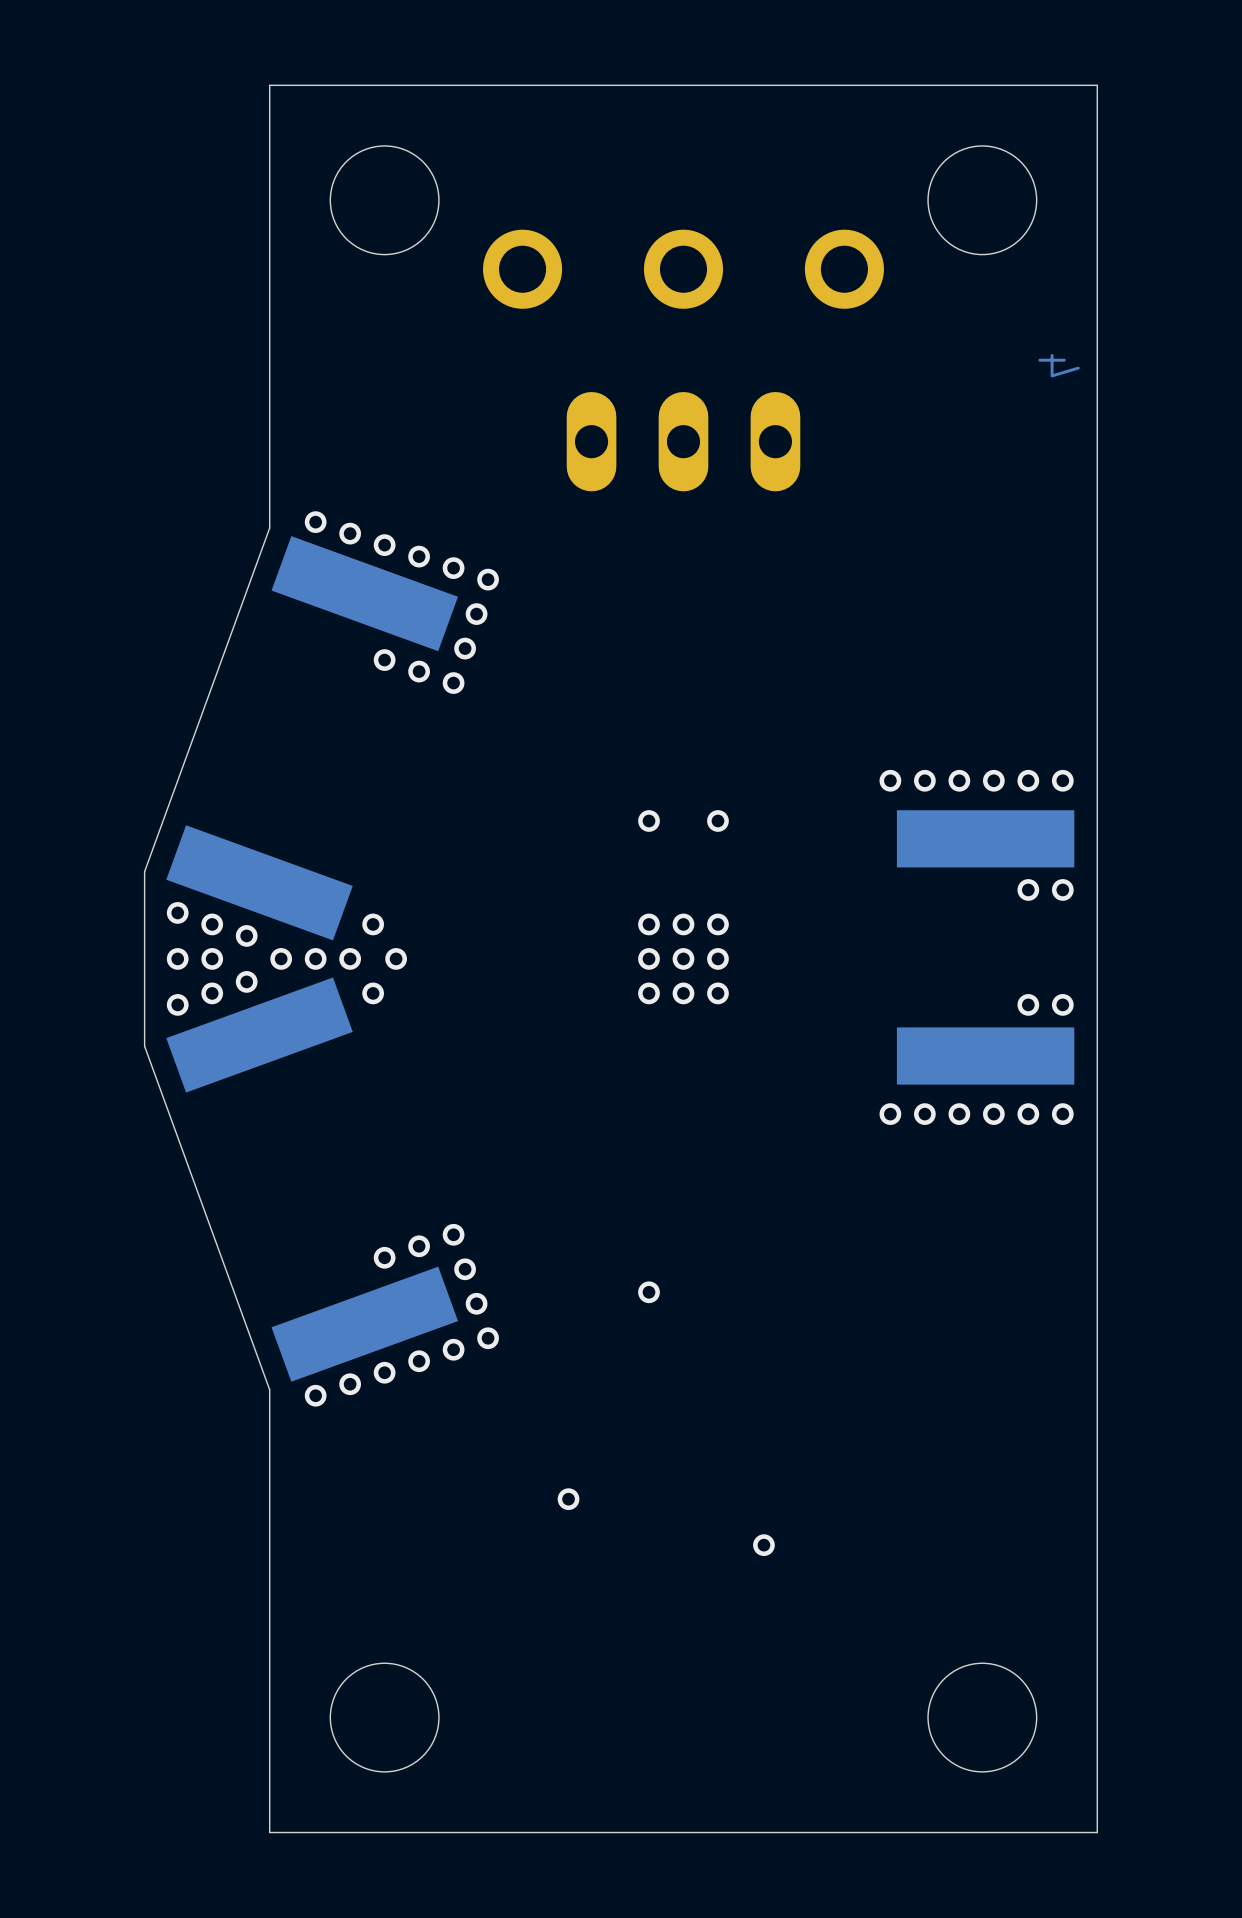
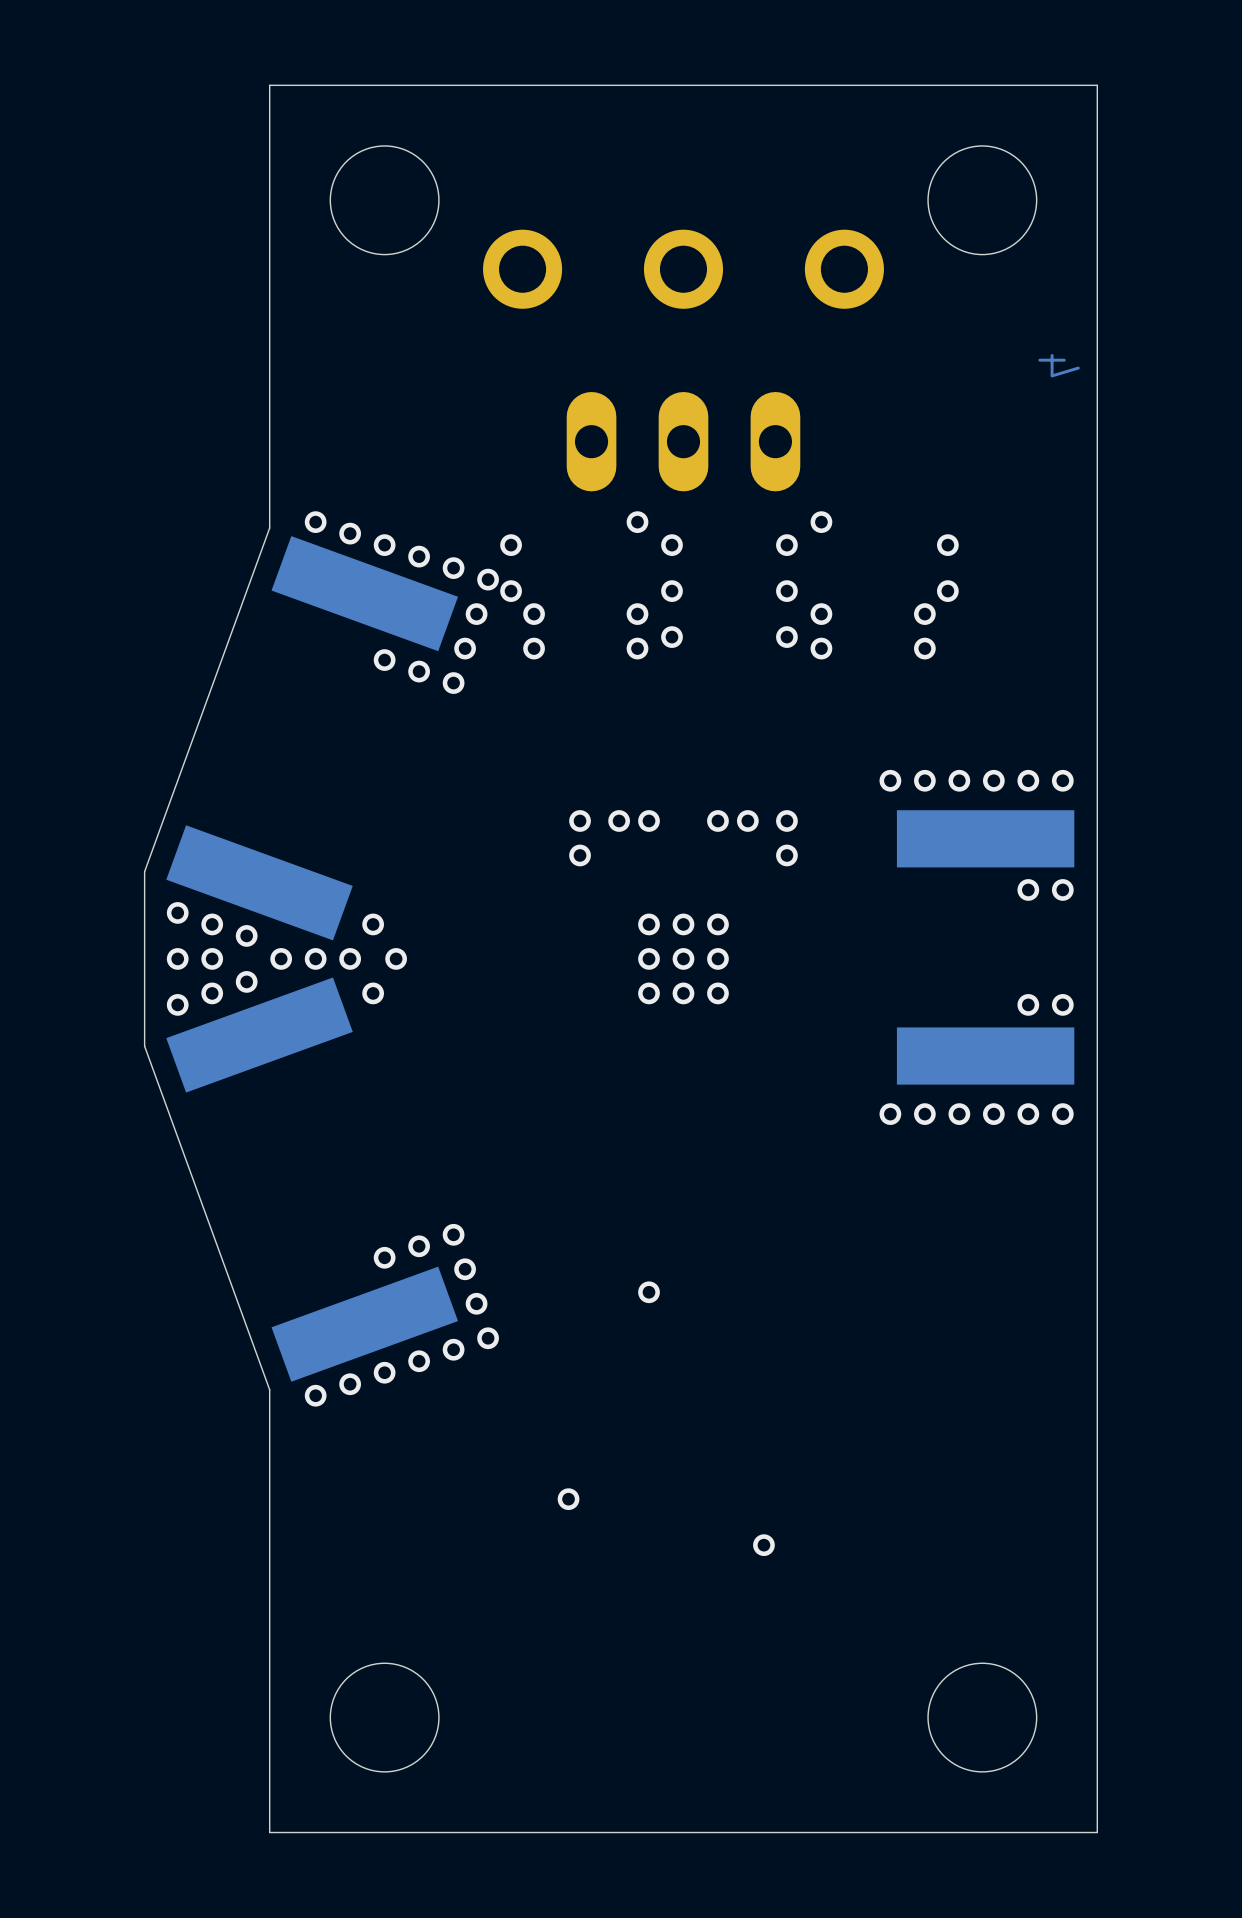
via: none -> (637, 522)
via: none -> (821, 522)
via: none -> (511, 545)
via: none -> (671, 545)
via: none -> (786, 545)
via: none -> (947, 545)
via: none -> (511, 591)
via: none -> (671, 591)
via: none -> (786, 591)
via: none -> (947, 591)
via: none -> (534, 614)
via: none -> (637, 614)
via: none -> (821, 614)
via: none -> (924, 614)
via: none -> (671, 637)
via: none -> (786, 637)
via: none -> (534, 648)
via: none -> (637, 648)
via: none -> (821, 648)
via: none -> (924, 648)
via: none -> (580, 820)
via: none -> (619, 820)
via: none -> (747, 820)
via: none -> (786, 820)
via: none -> (580, 855)
via: none -> (786, 855)

